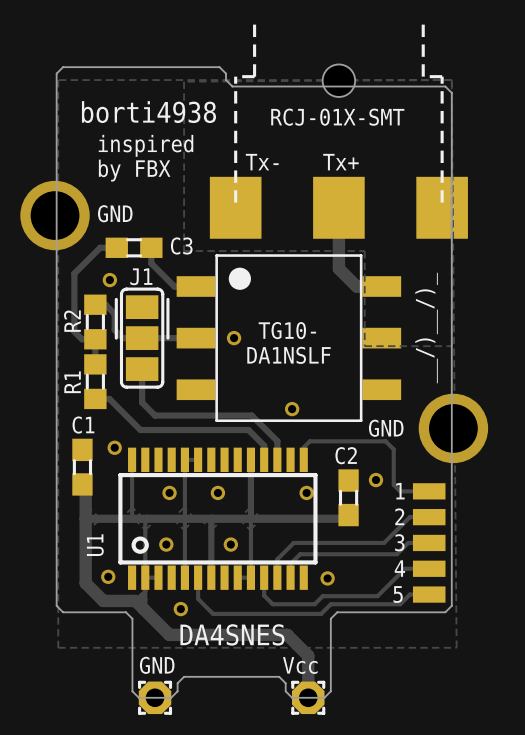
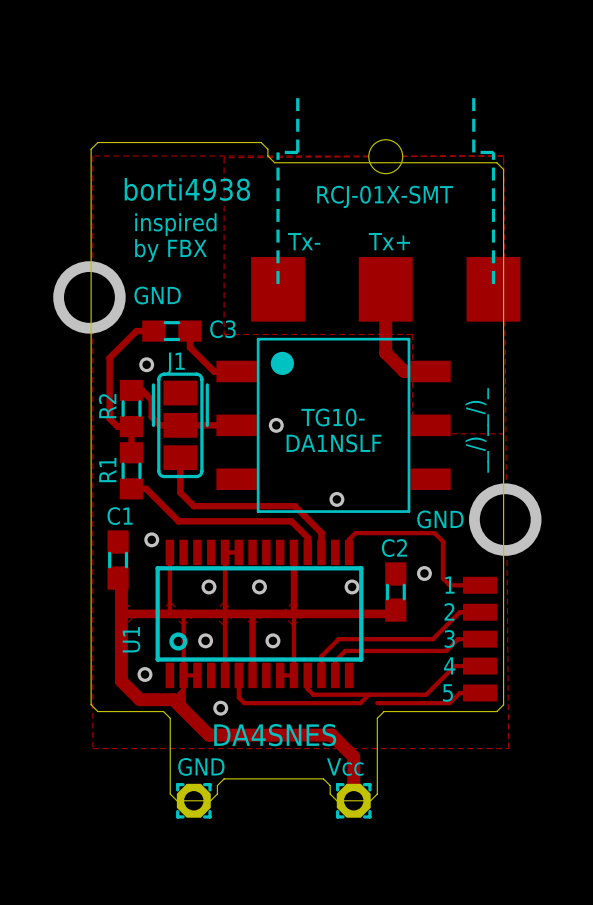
via: (327, 578) -> none
track: (264, 590) (264, 595) (272, 604) -> (307, 689) (313, 694) (368, 694)
track: (203, 604) (213, 613) (321, 613) (330, 604) -> (244, 703) (316, 703)

